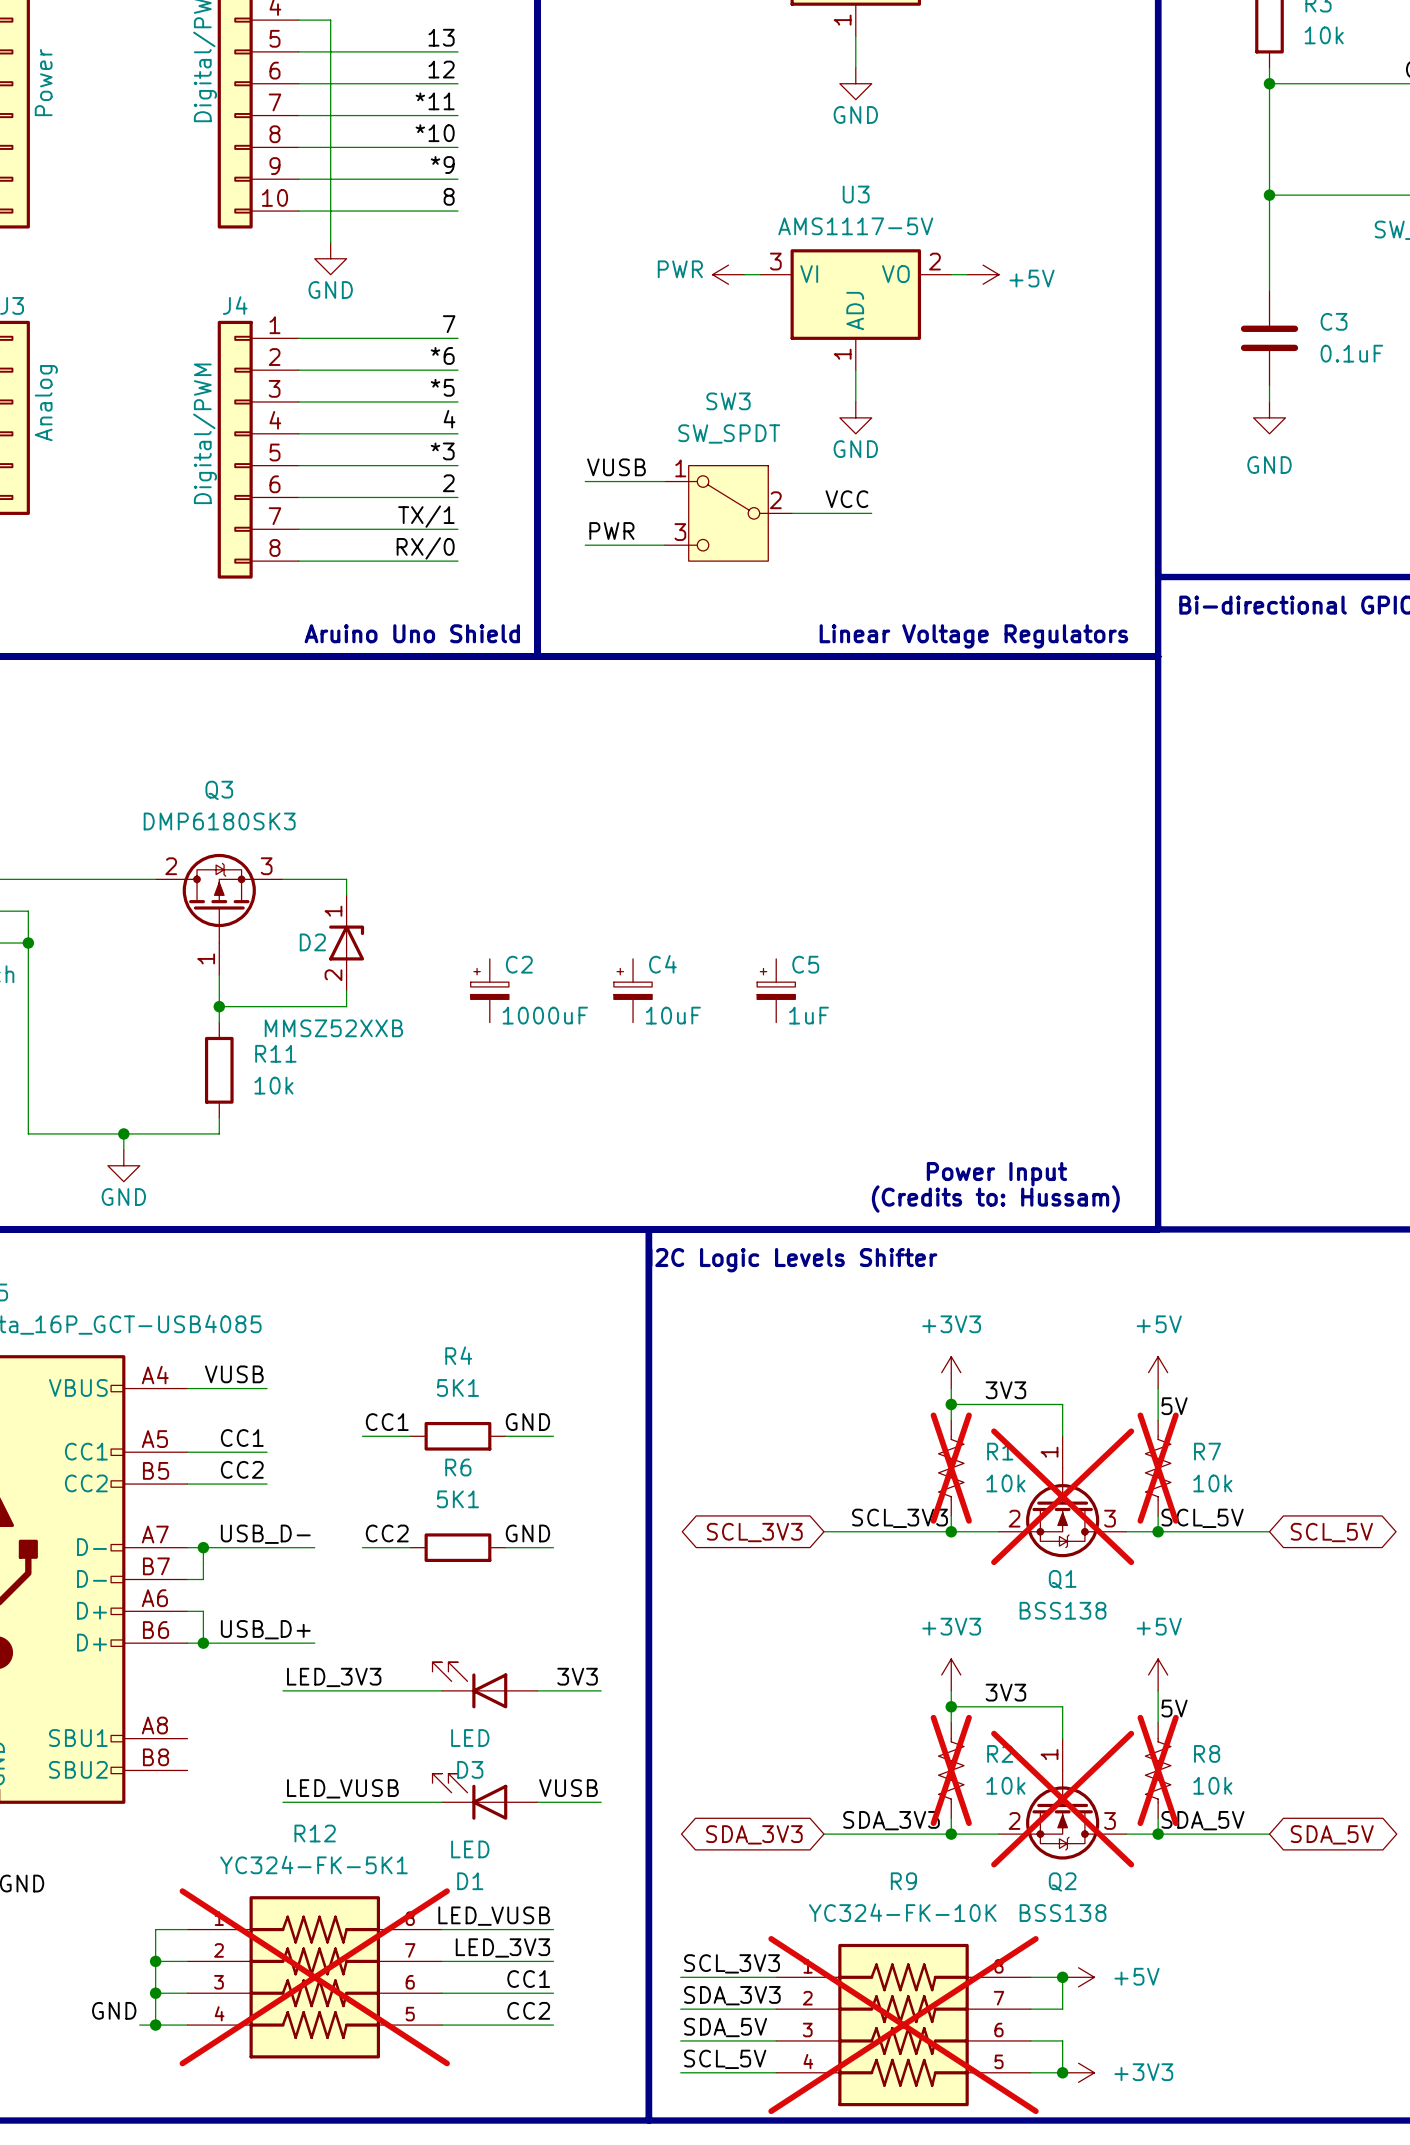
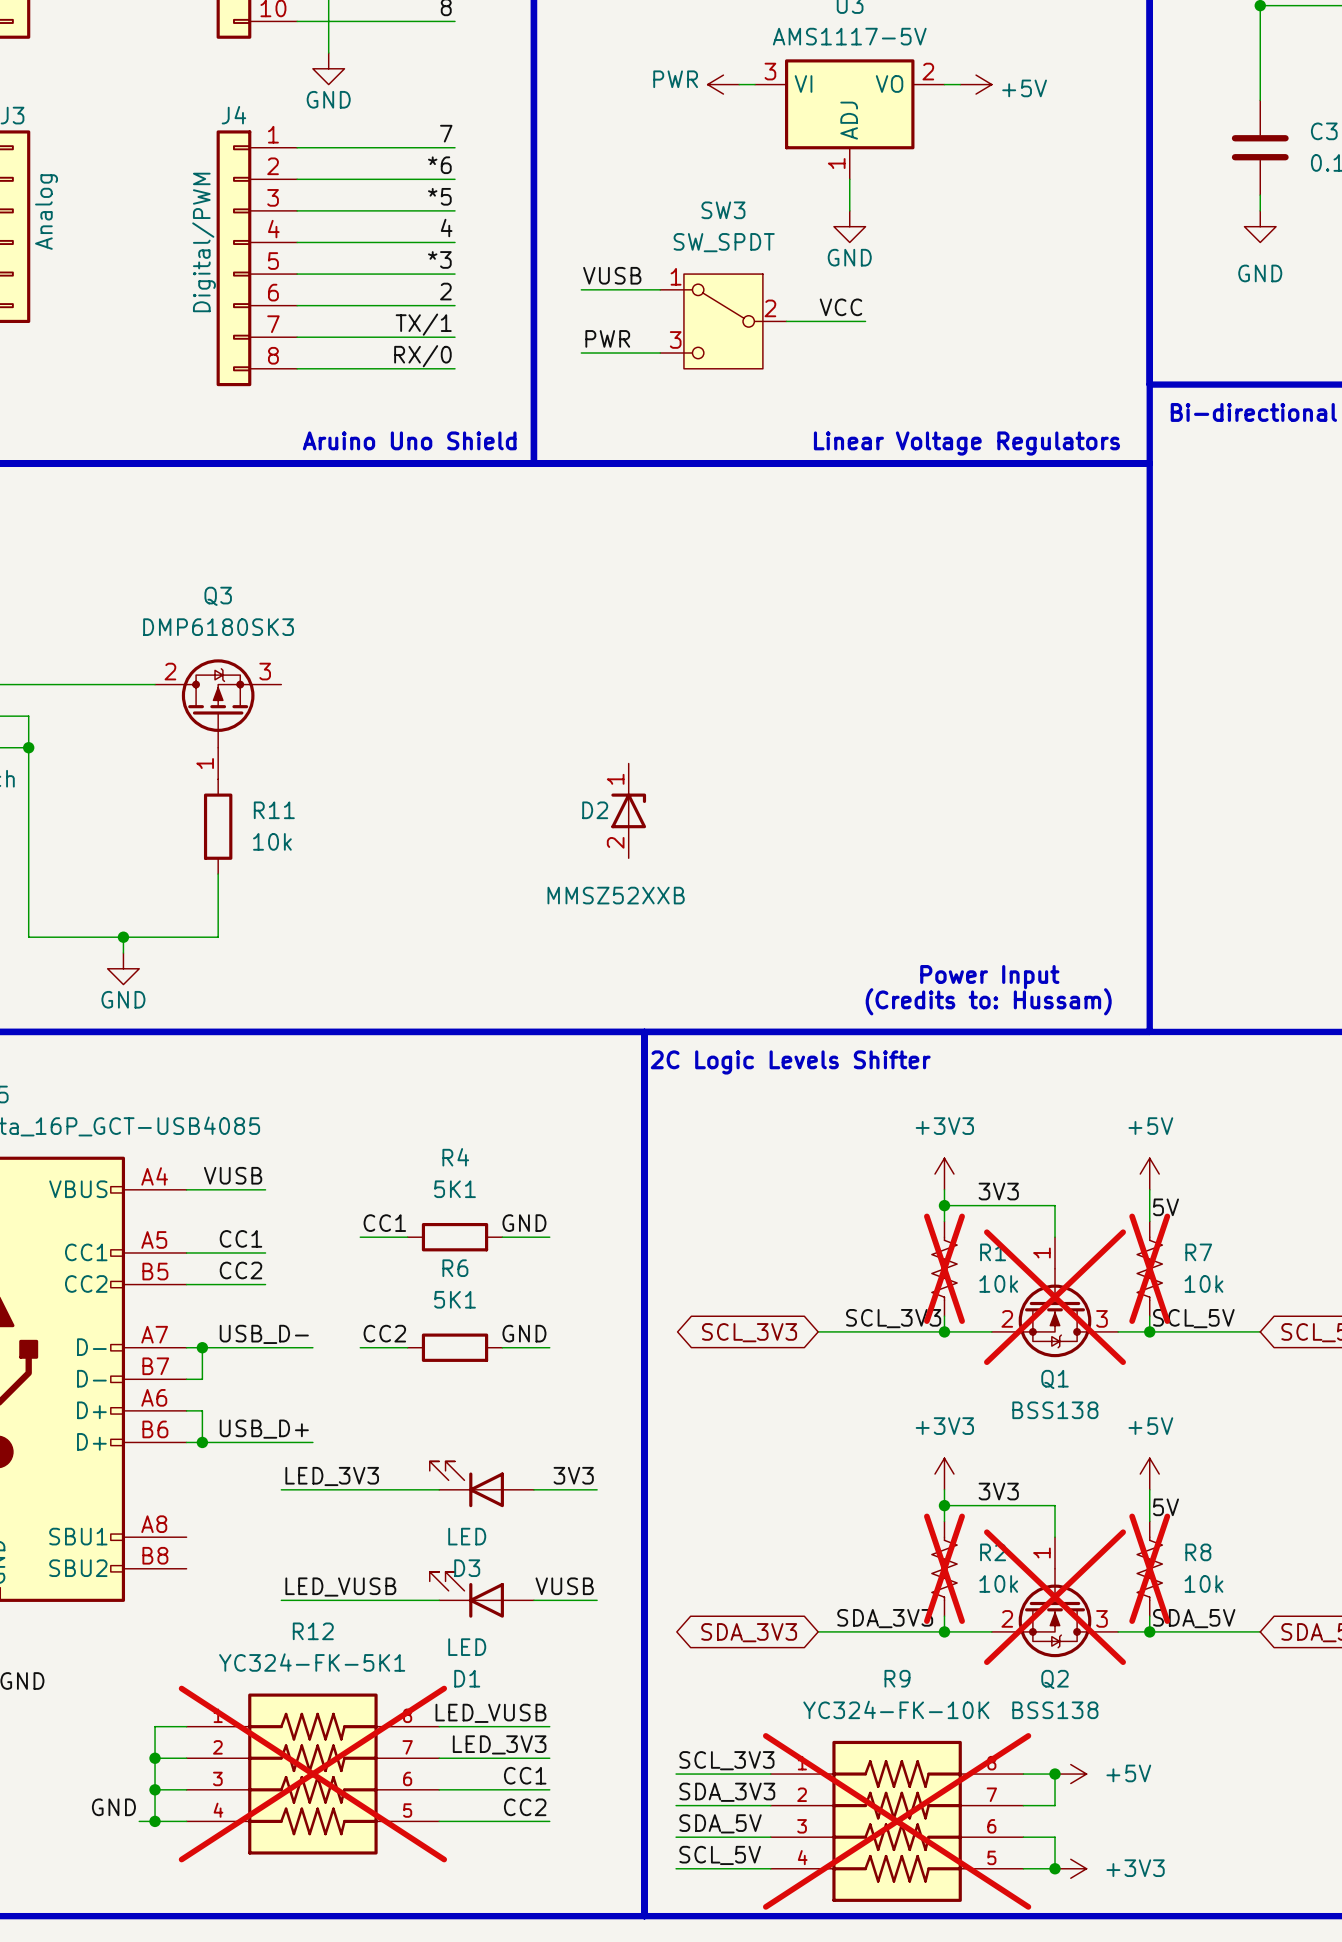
wire: (282, 879) (346, 879) (346, 895) -> none
D2 position: (346, 943) -> (628, 810)
wire: (219, 974) (219, 1022) -> (218, 874) (218, 921)
wire: (346, 990) (346, 1006) (219, 1006) -> none
C2: 1000uF (489, 990) -> none
C4: 10uF (633, 990) -> none
C5: 1uF (776, 990) -> none
junction: (219, 1006) -> none
R11 position: (219, 1070) -> (218, 826)

